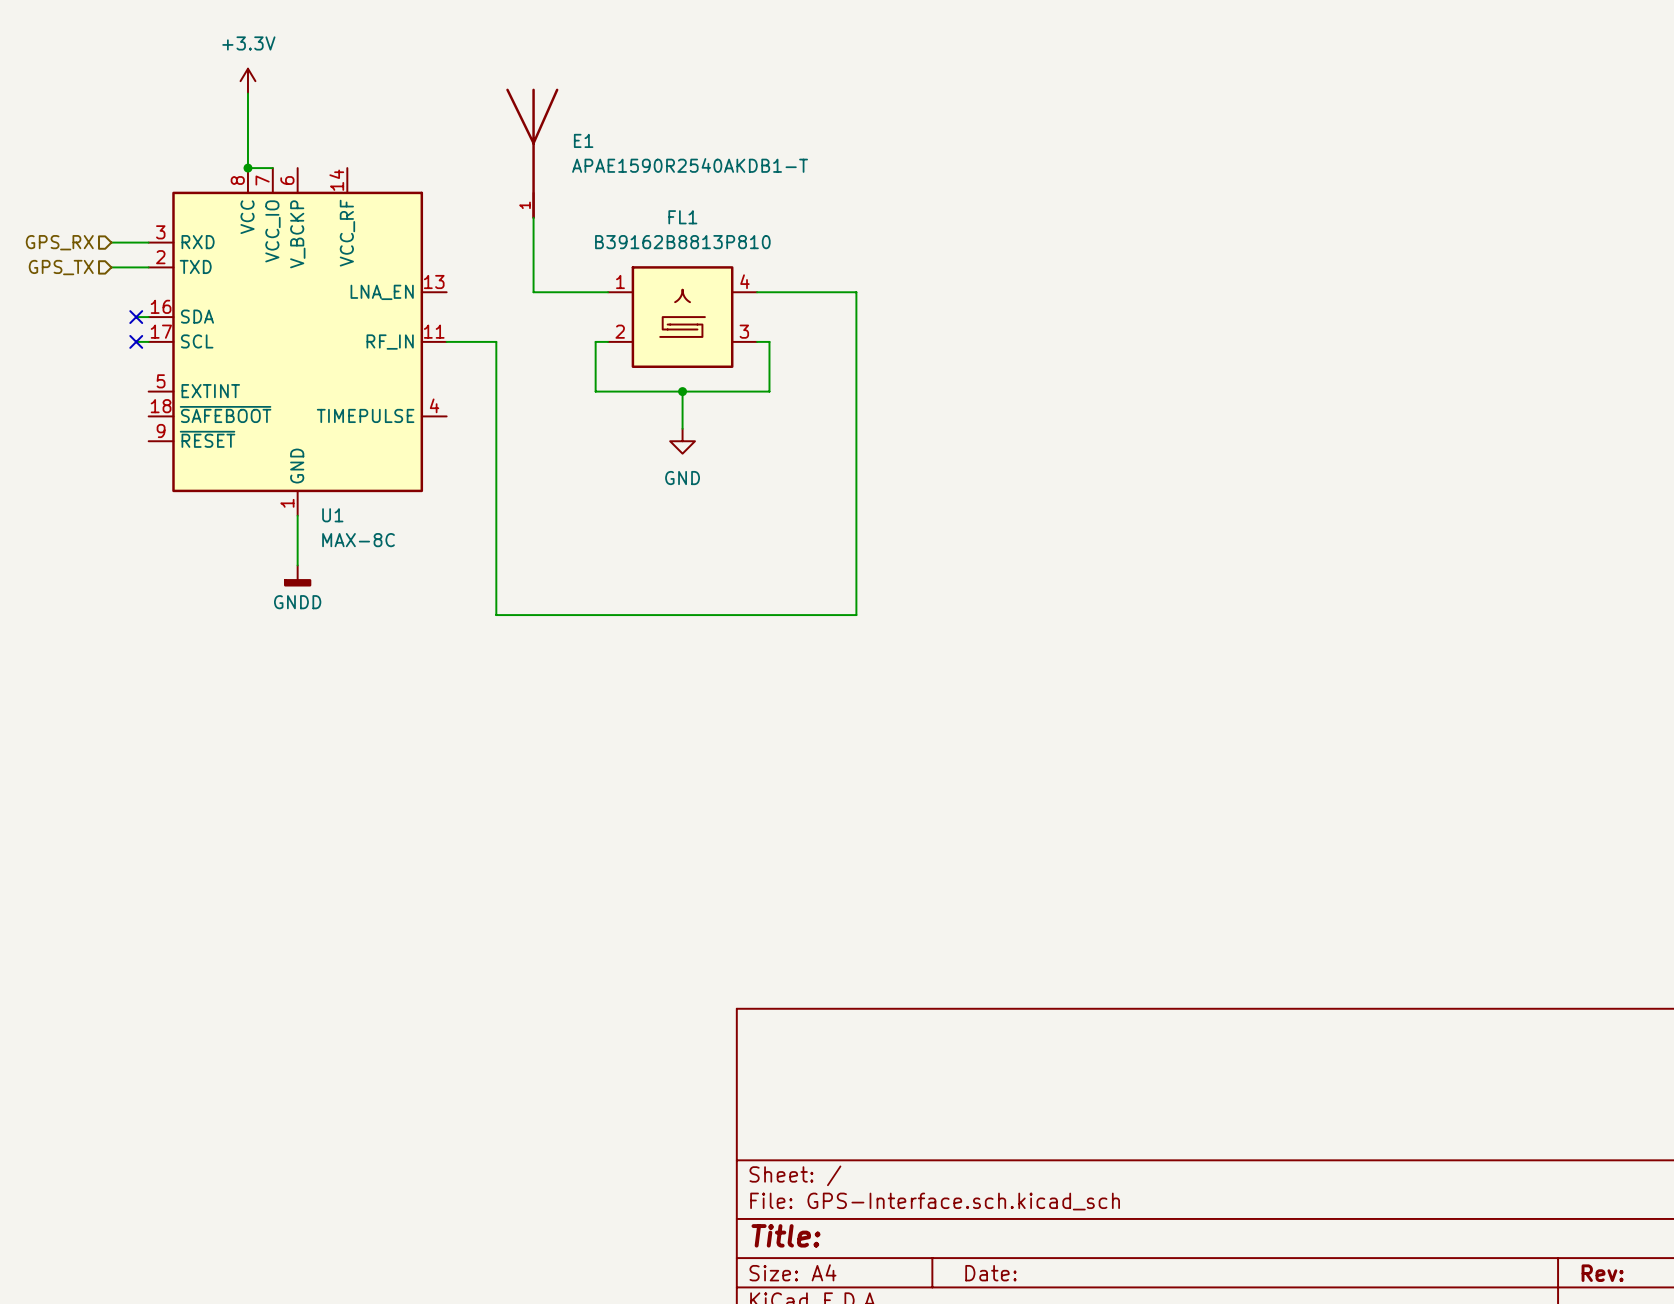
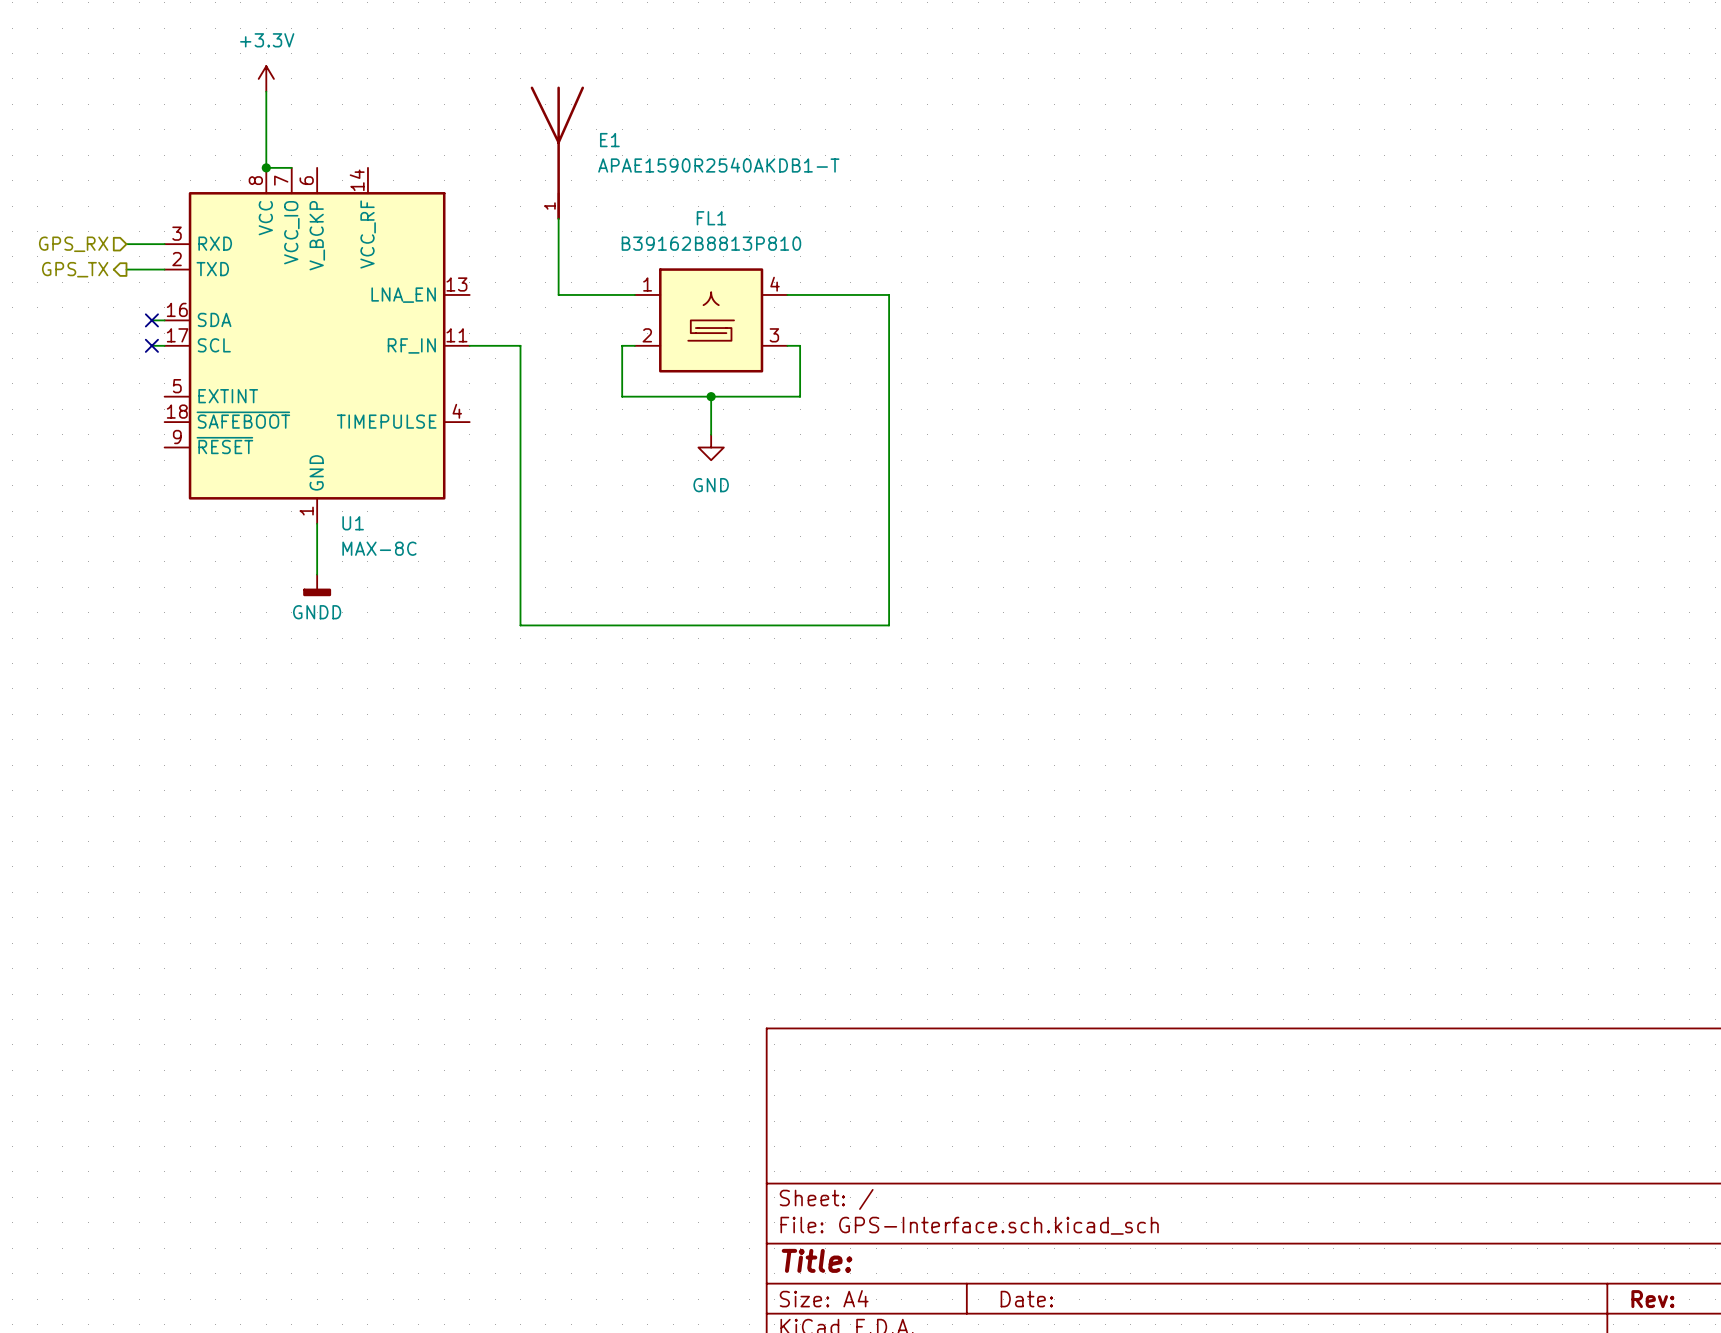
hierarchical label shape: input (61, 267) -> output (75, 269)

